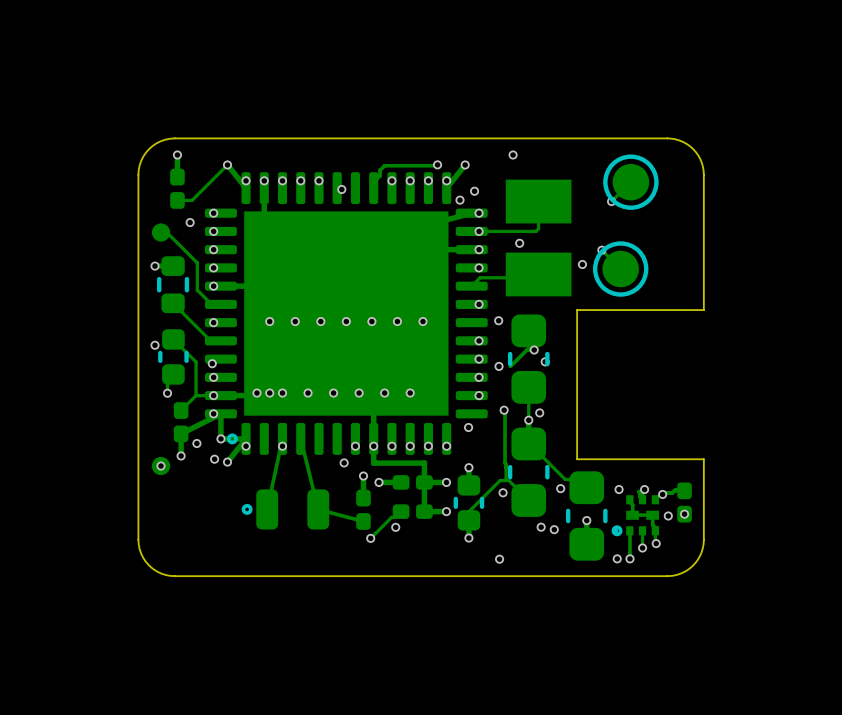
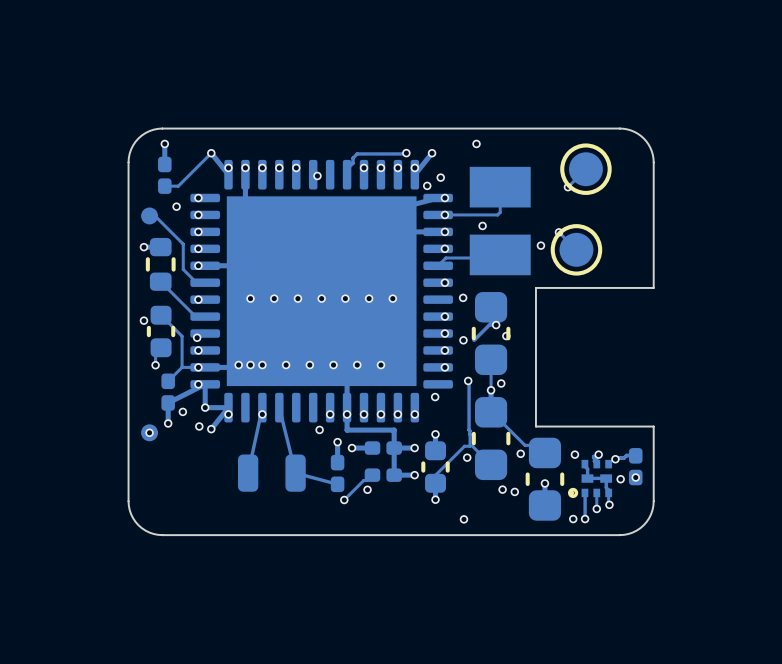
part footprint: [204, 172, 488, 455] -> [190, 159, 453, 423]
part footprint: [241, 489, 330, 530] -> [237, 454, 306, 492]

